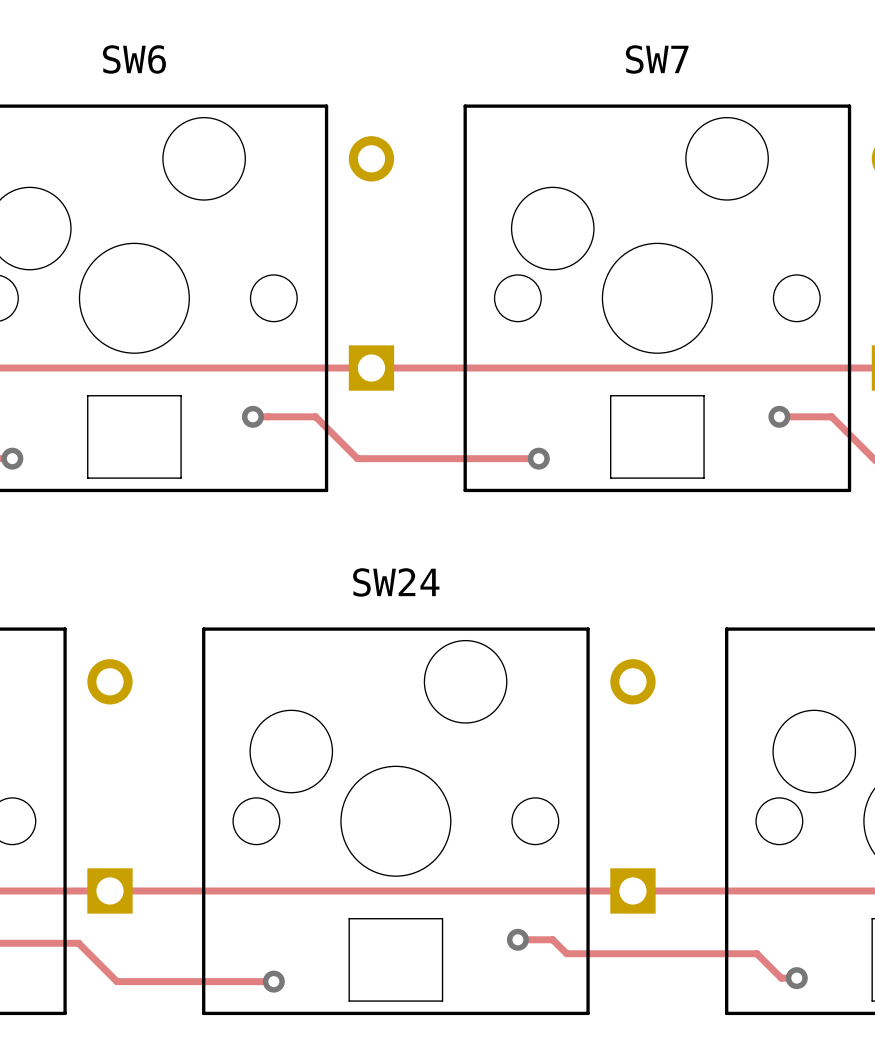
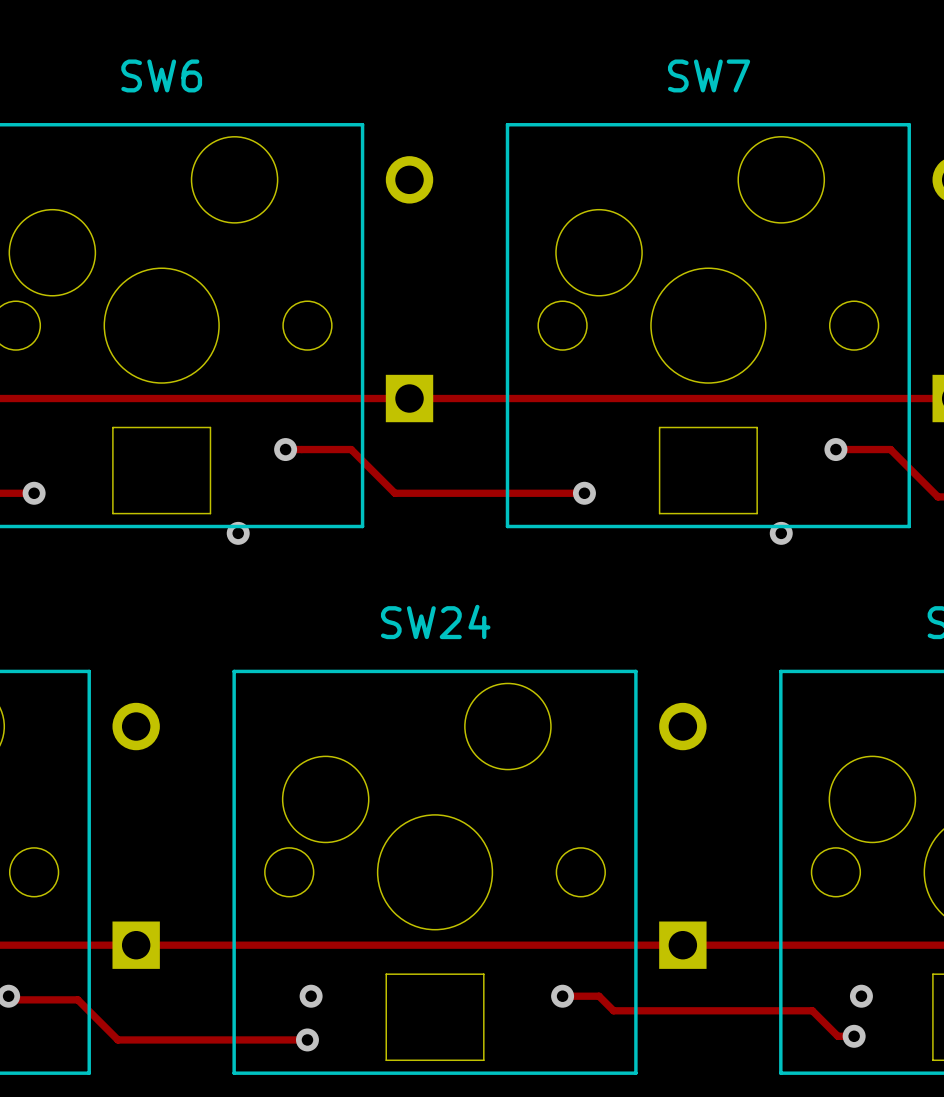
via: none -> (238, 533)
via: none -> (781, 533)
via: none -> (311, 996)
via: none -> (861, 996)
track: (54, 943) (78, 943) (116, 981) -> (77, 999) (117, 1039) (143, 1039)

